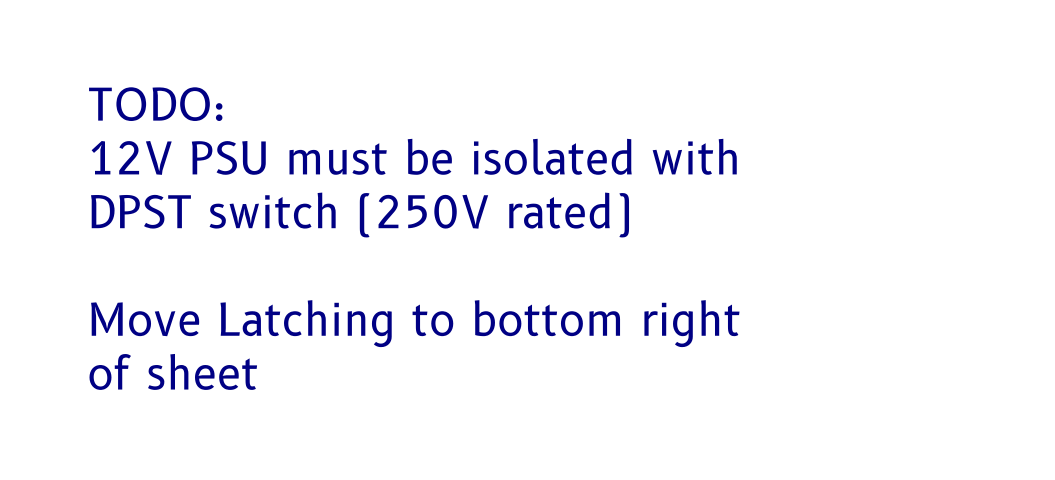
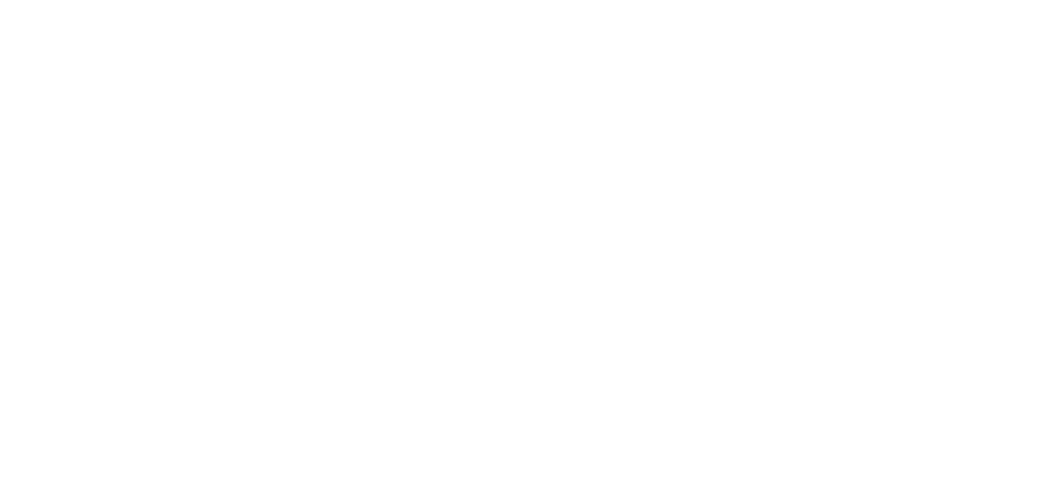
text: TODO: (155, 104) -> none
text: 12V PSU must be isolated with (414, 156) -> none
text: DPST switch (250V rated) (360, 215) -> none
text: Move Latching to bottom right (415, 323) -> none
text: of sheet (173, 371) -> none

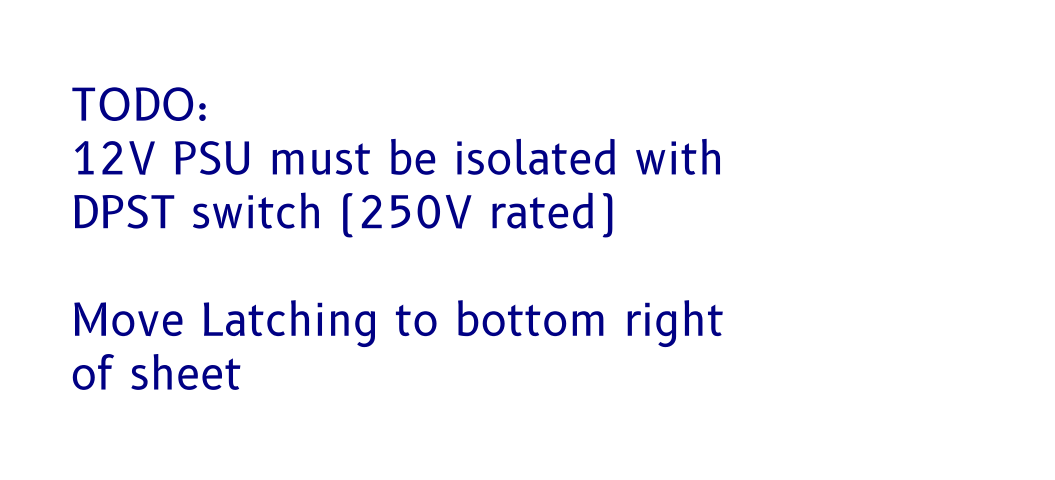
text: none -> TODO: (139, 104)
text: none -> 12V PSU must be isolated with (397, 156)
text: none -> DPST switch (250V rated) (343, 215)
text: none -> Move Latching to bottom right (398, 323)
text: none -> of sheet (156, 371)

